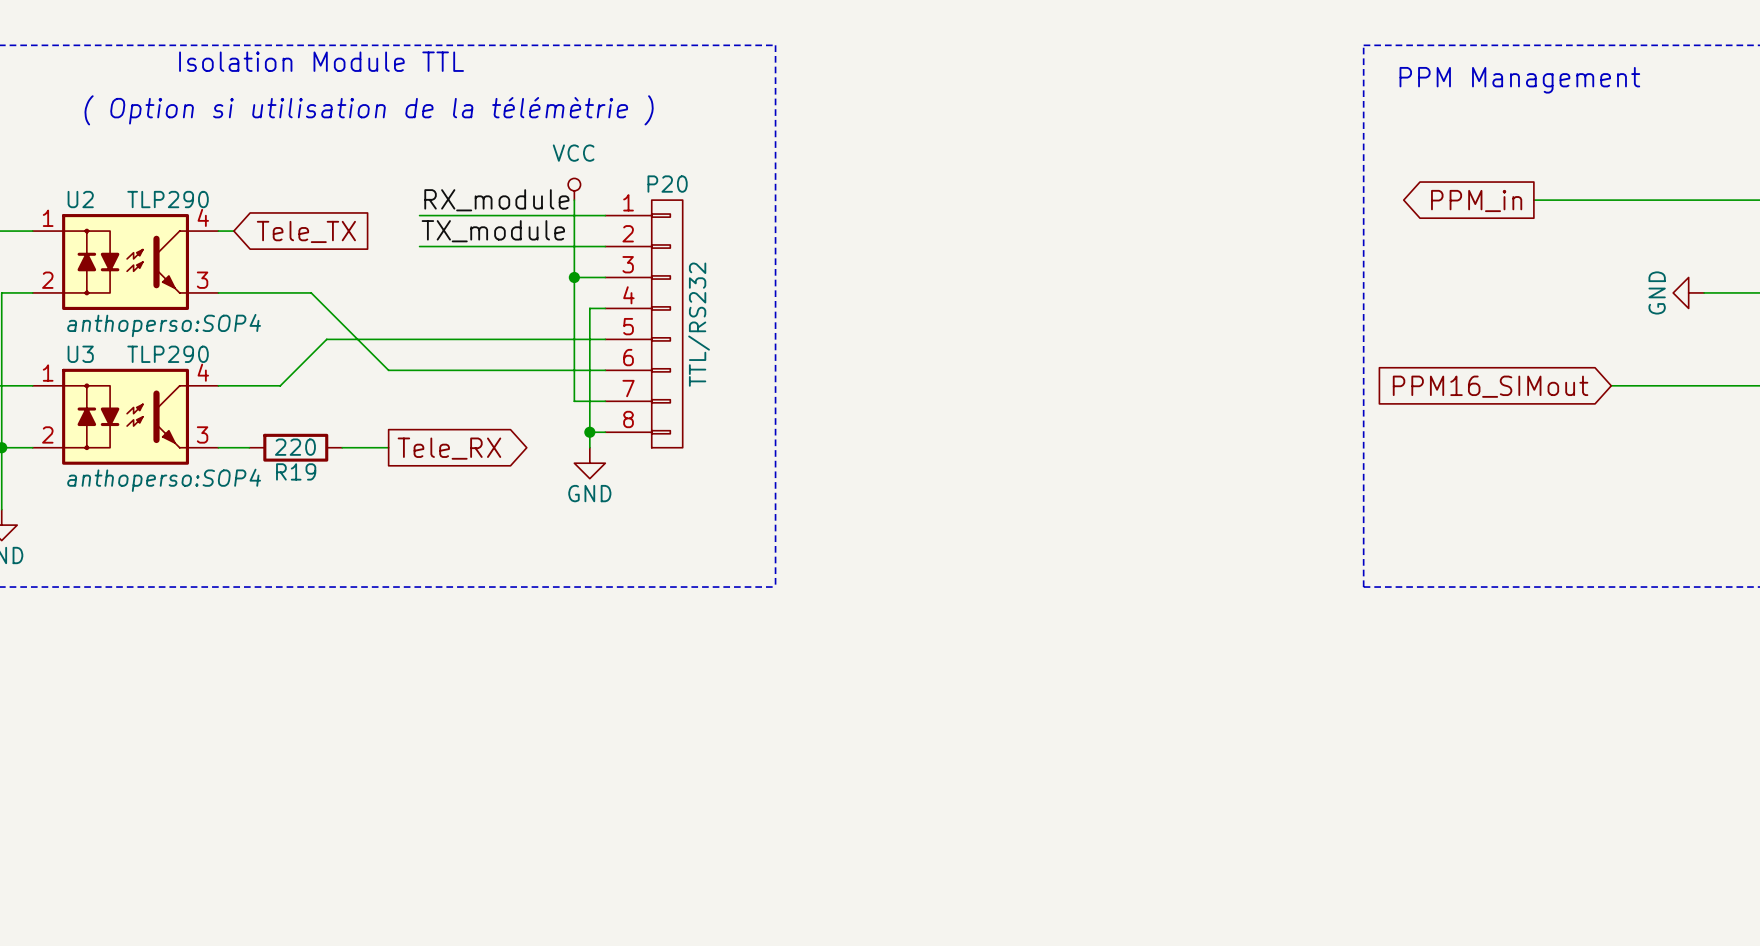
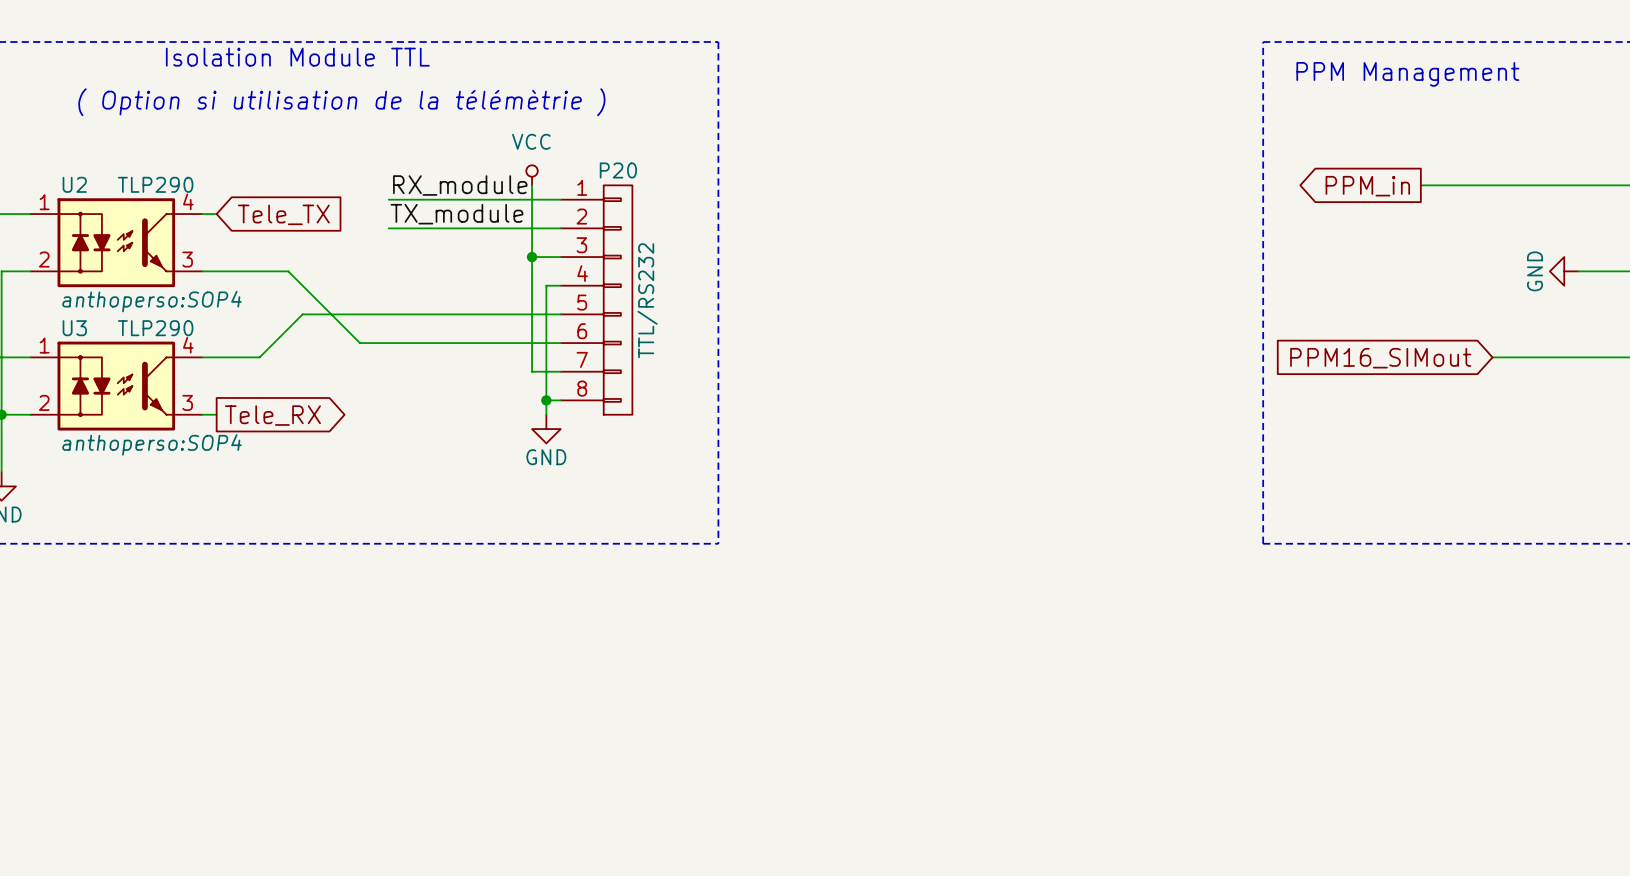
wire: (233, 447) (249, 447) -> none
R19: 220 (295, 447) -> none
wire: (342, 447) (388, 447) -> none
global label position: Tele_RX (449, 448) -> Tele_RX (272, 415)

